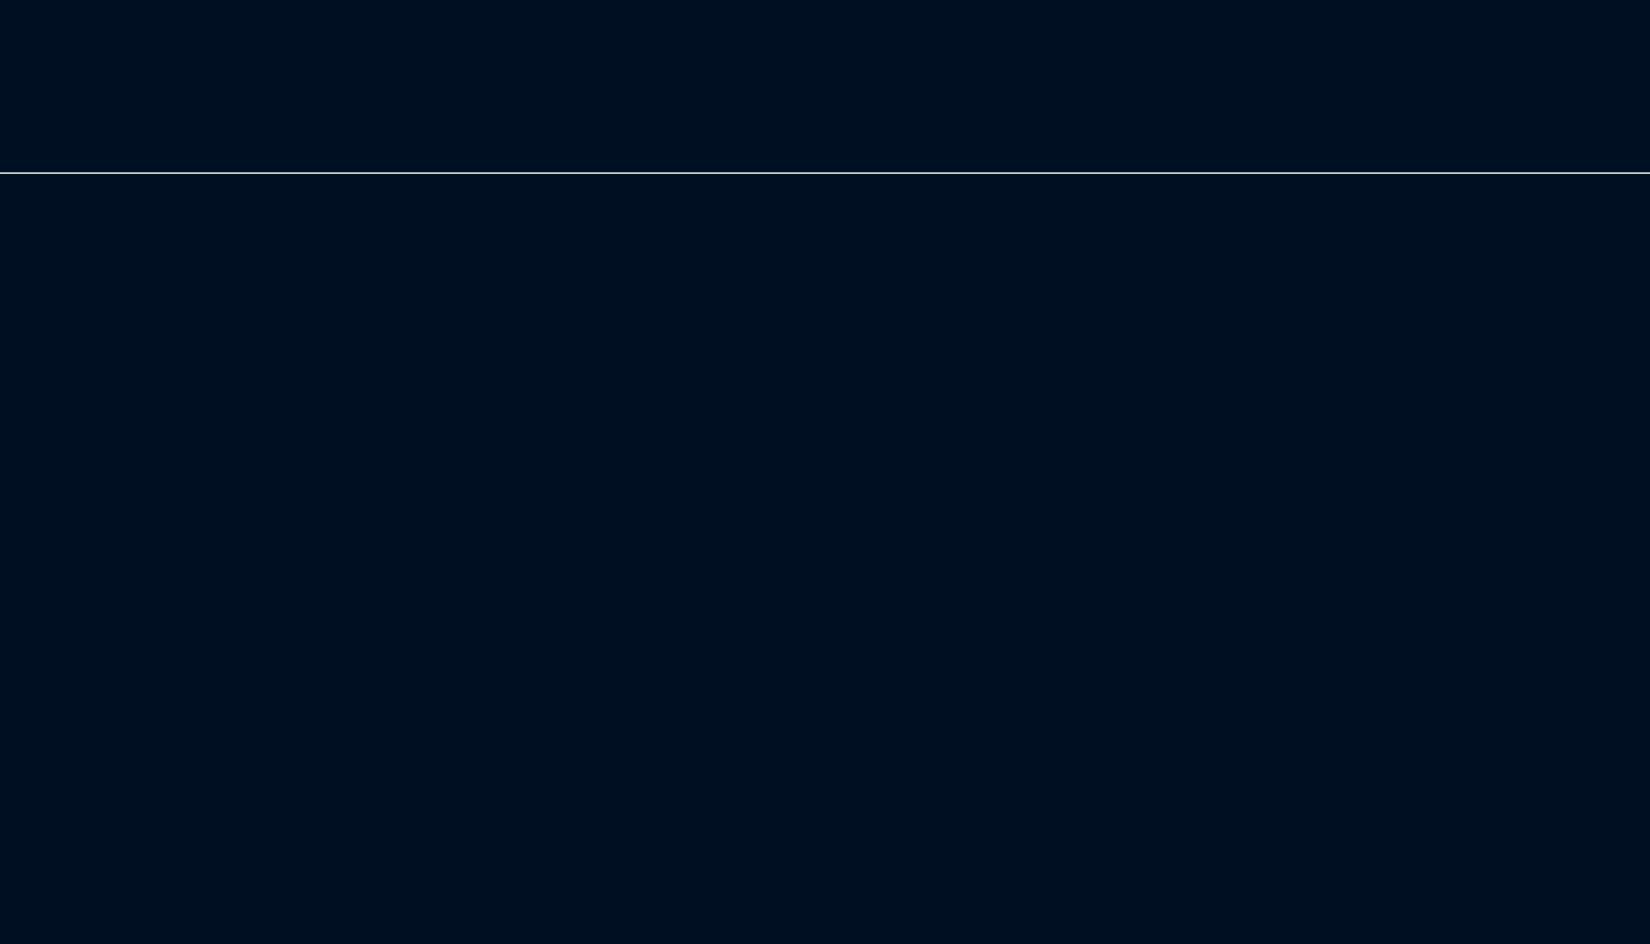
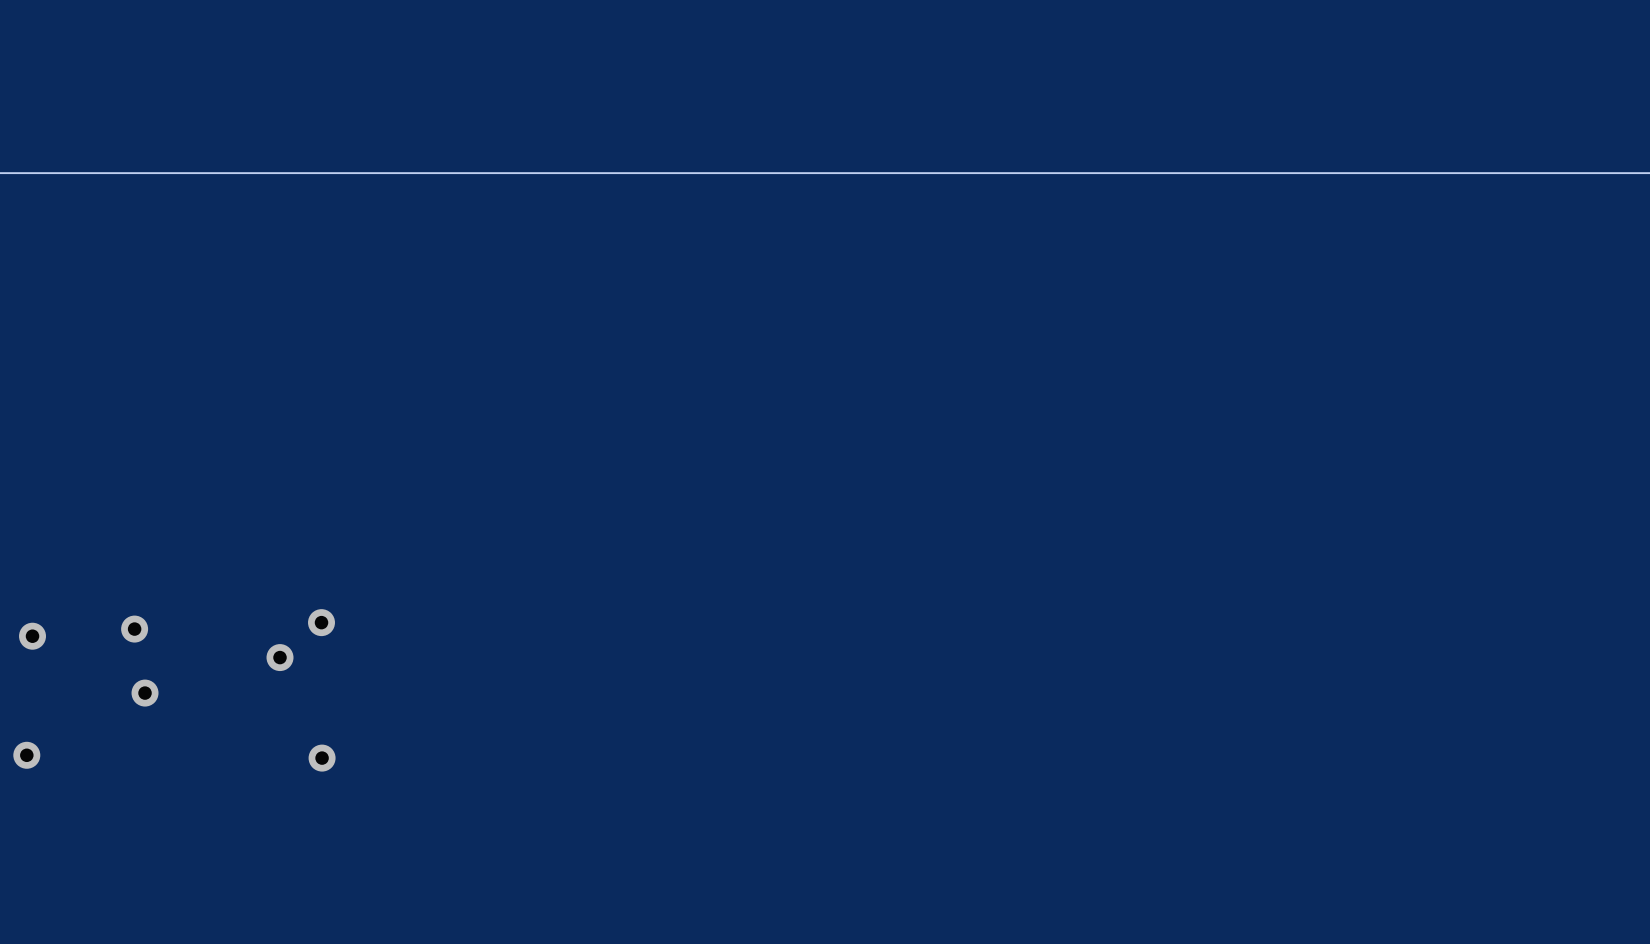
via: none -> (321, 622)
via: none -> (134, 629)
via: none -> (32, 636)
via: none -> (280, 657)
via: none -> (145, 693)
via: none -> (26, 755)
via: none -> (322, 758)

